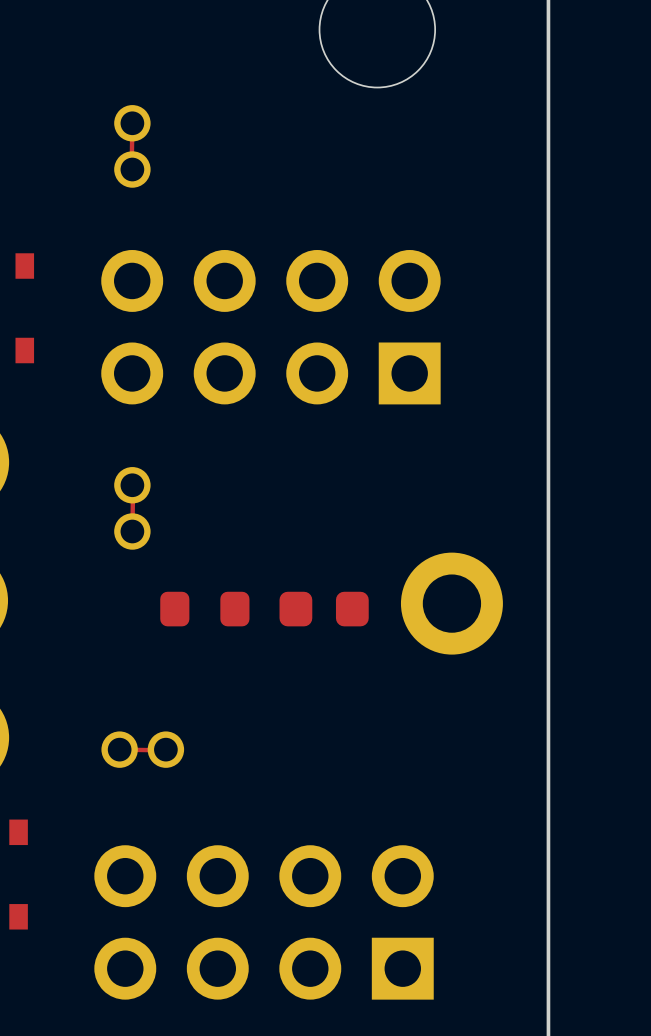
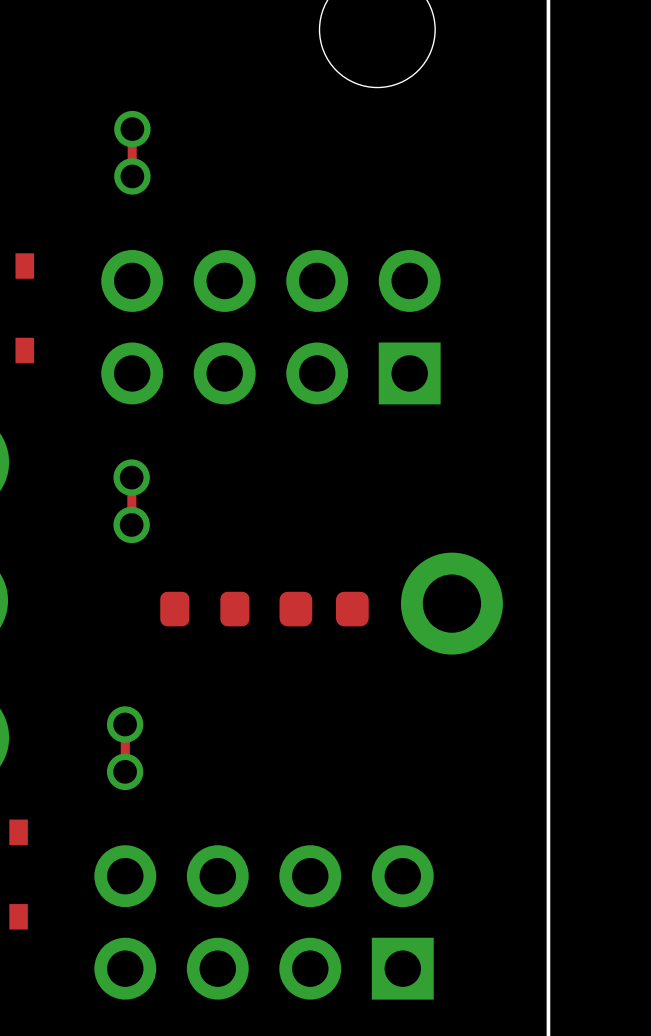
part footprint: [114, 105, 151, 188] -> [114, 110, 151, 195]
part footprint: [114, 467, 151, 550] -> [113, 459, 150, 544]
part footprint: [101, 731, 185, 768] -> [106, 706, 144, 791]

